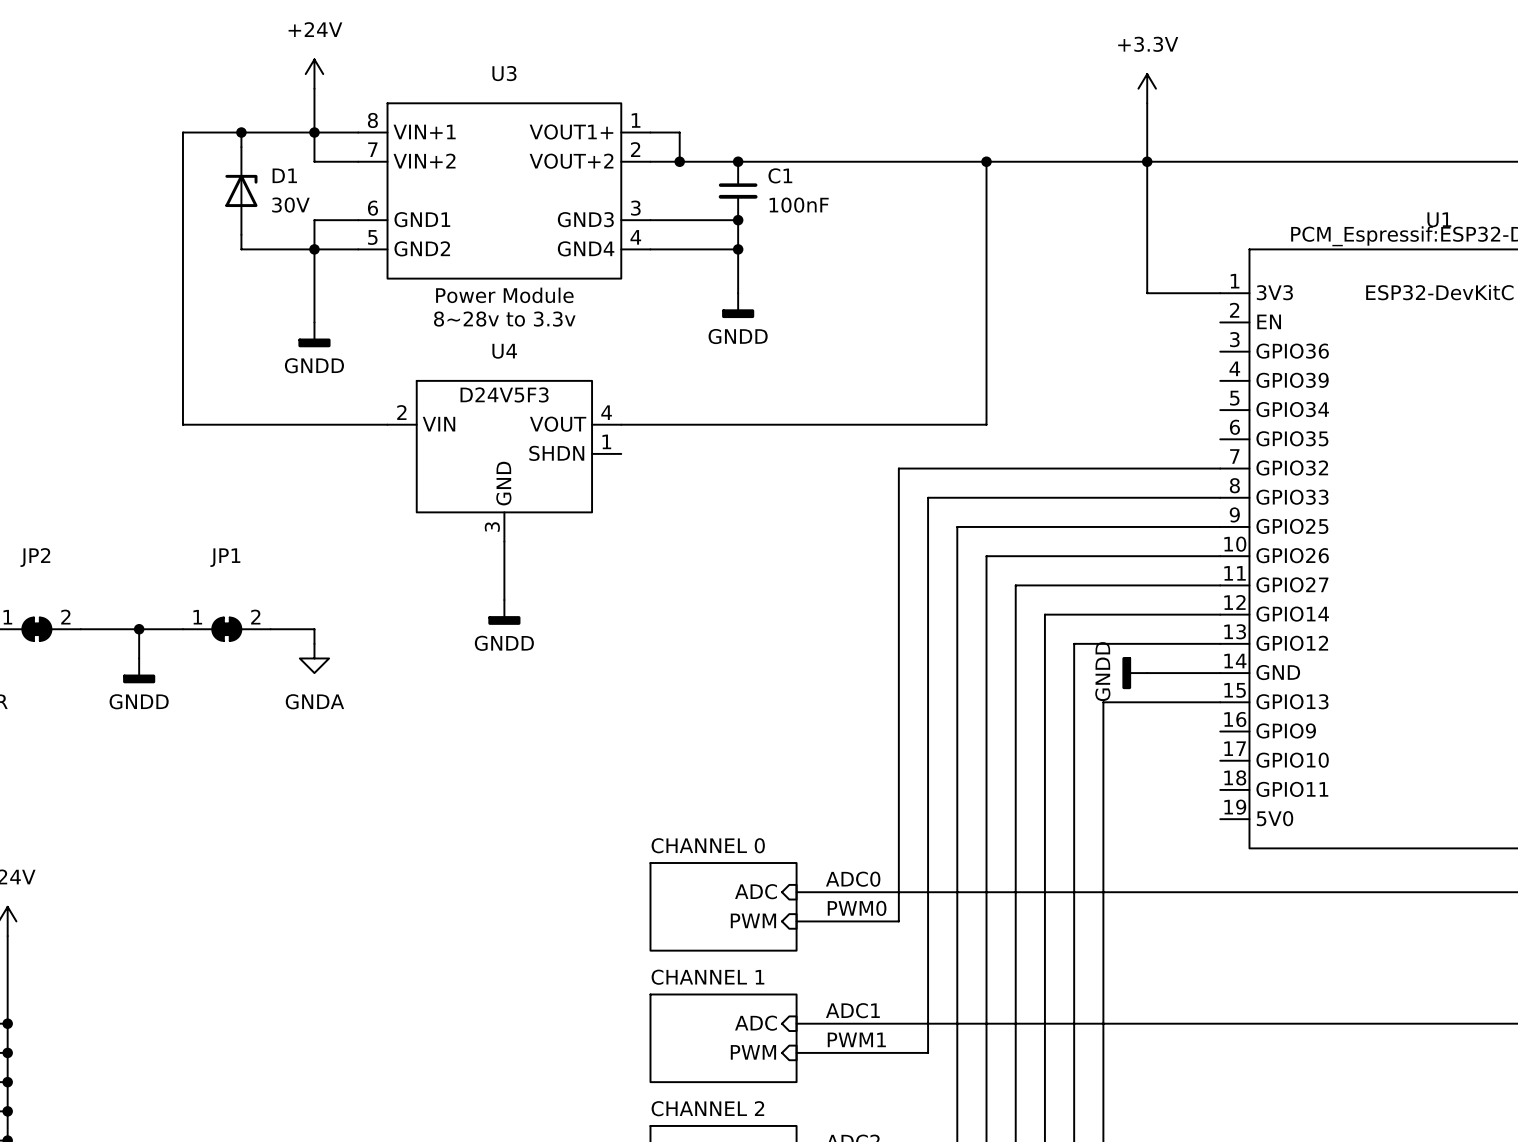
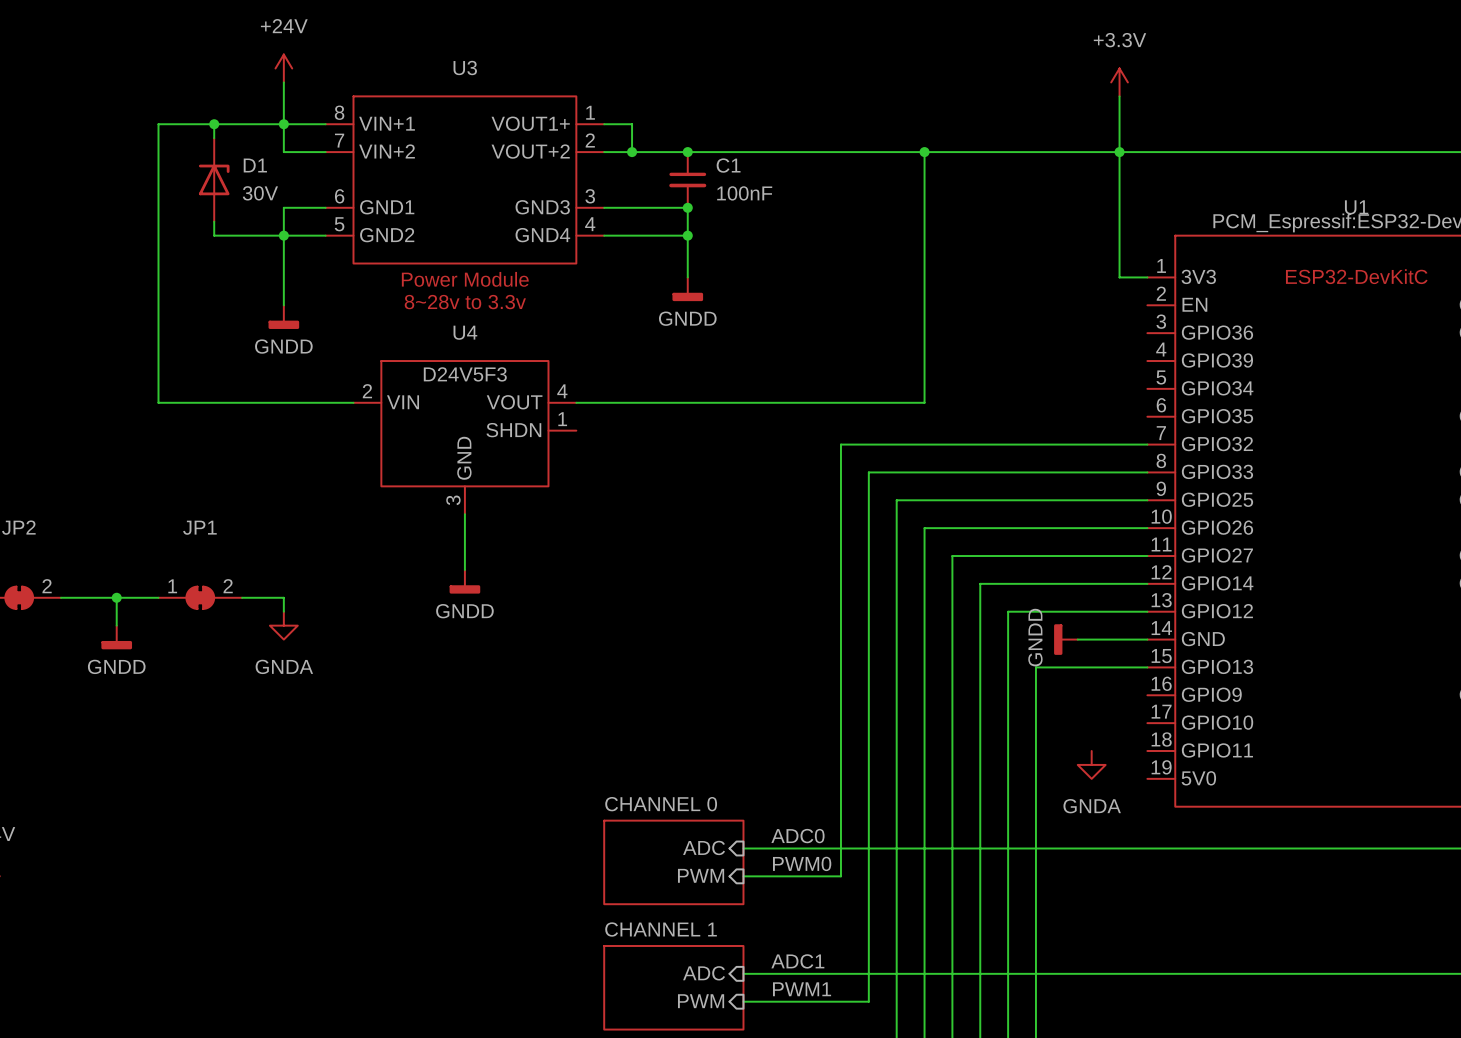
power symbol position: +3.3V (1147, 88) -> +3.3V (1119, 82)
wire: (1147, 103) (1147, 293) (1191, 293) -> (1119, 96) (1119, 277)
junction position: (1147, 161) -> (1119, 152)
power symbol: none -> GNDA (1091, 764)

